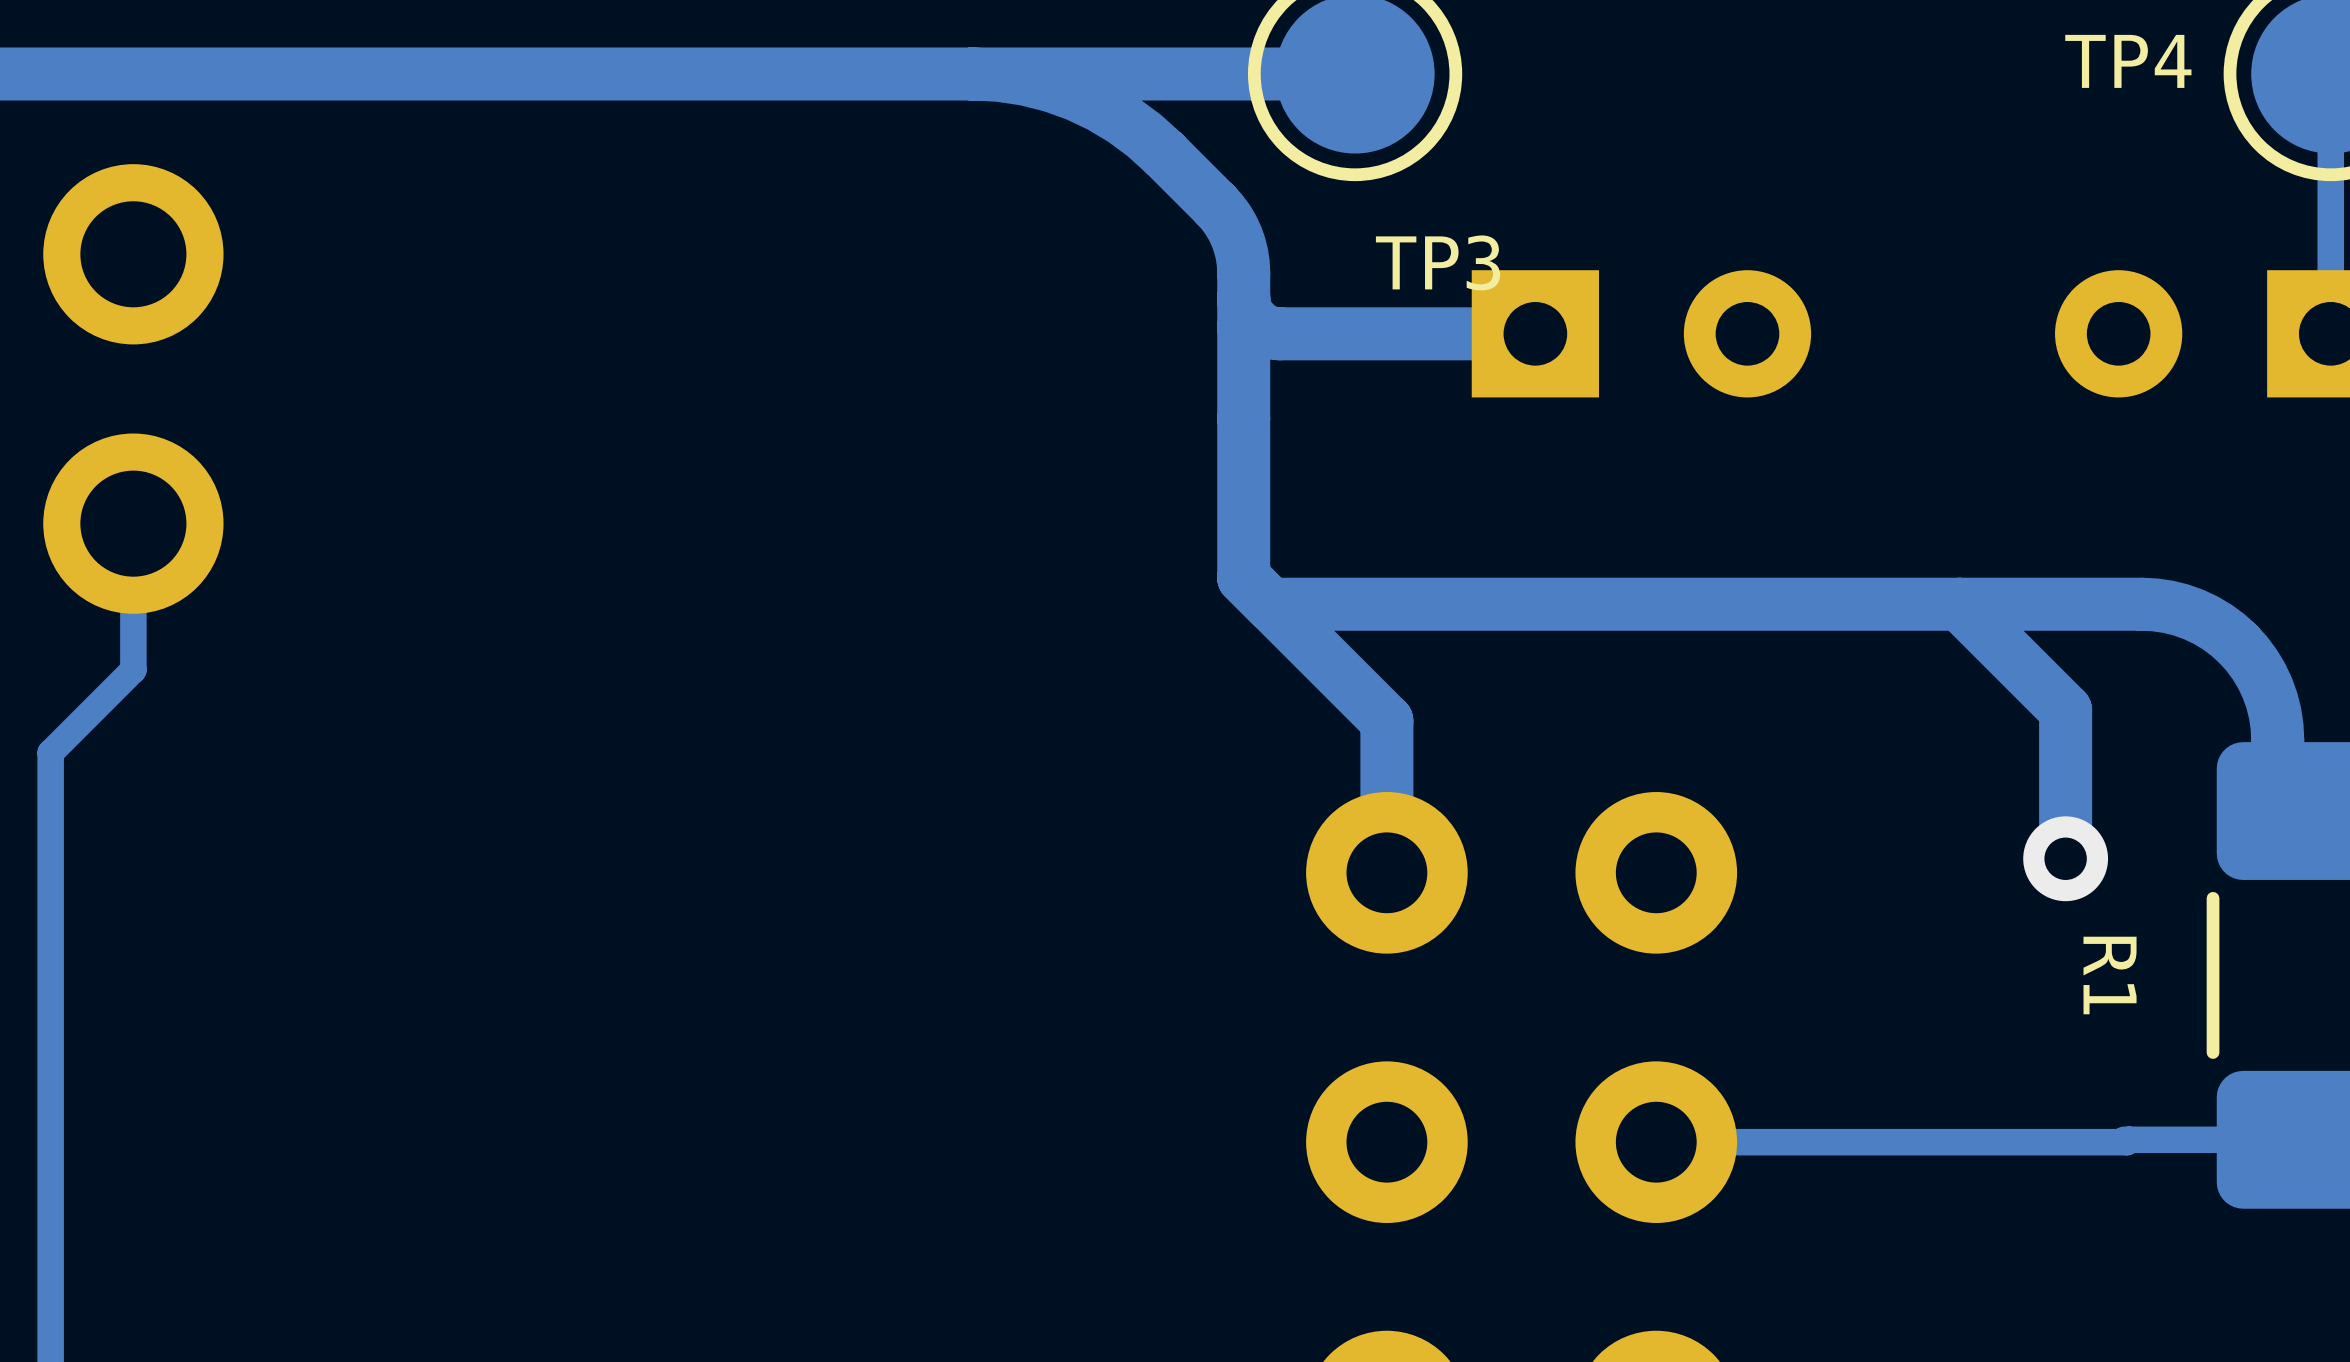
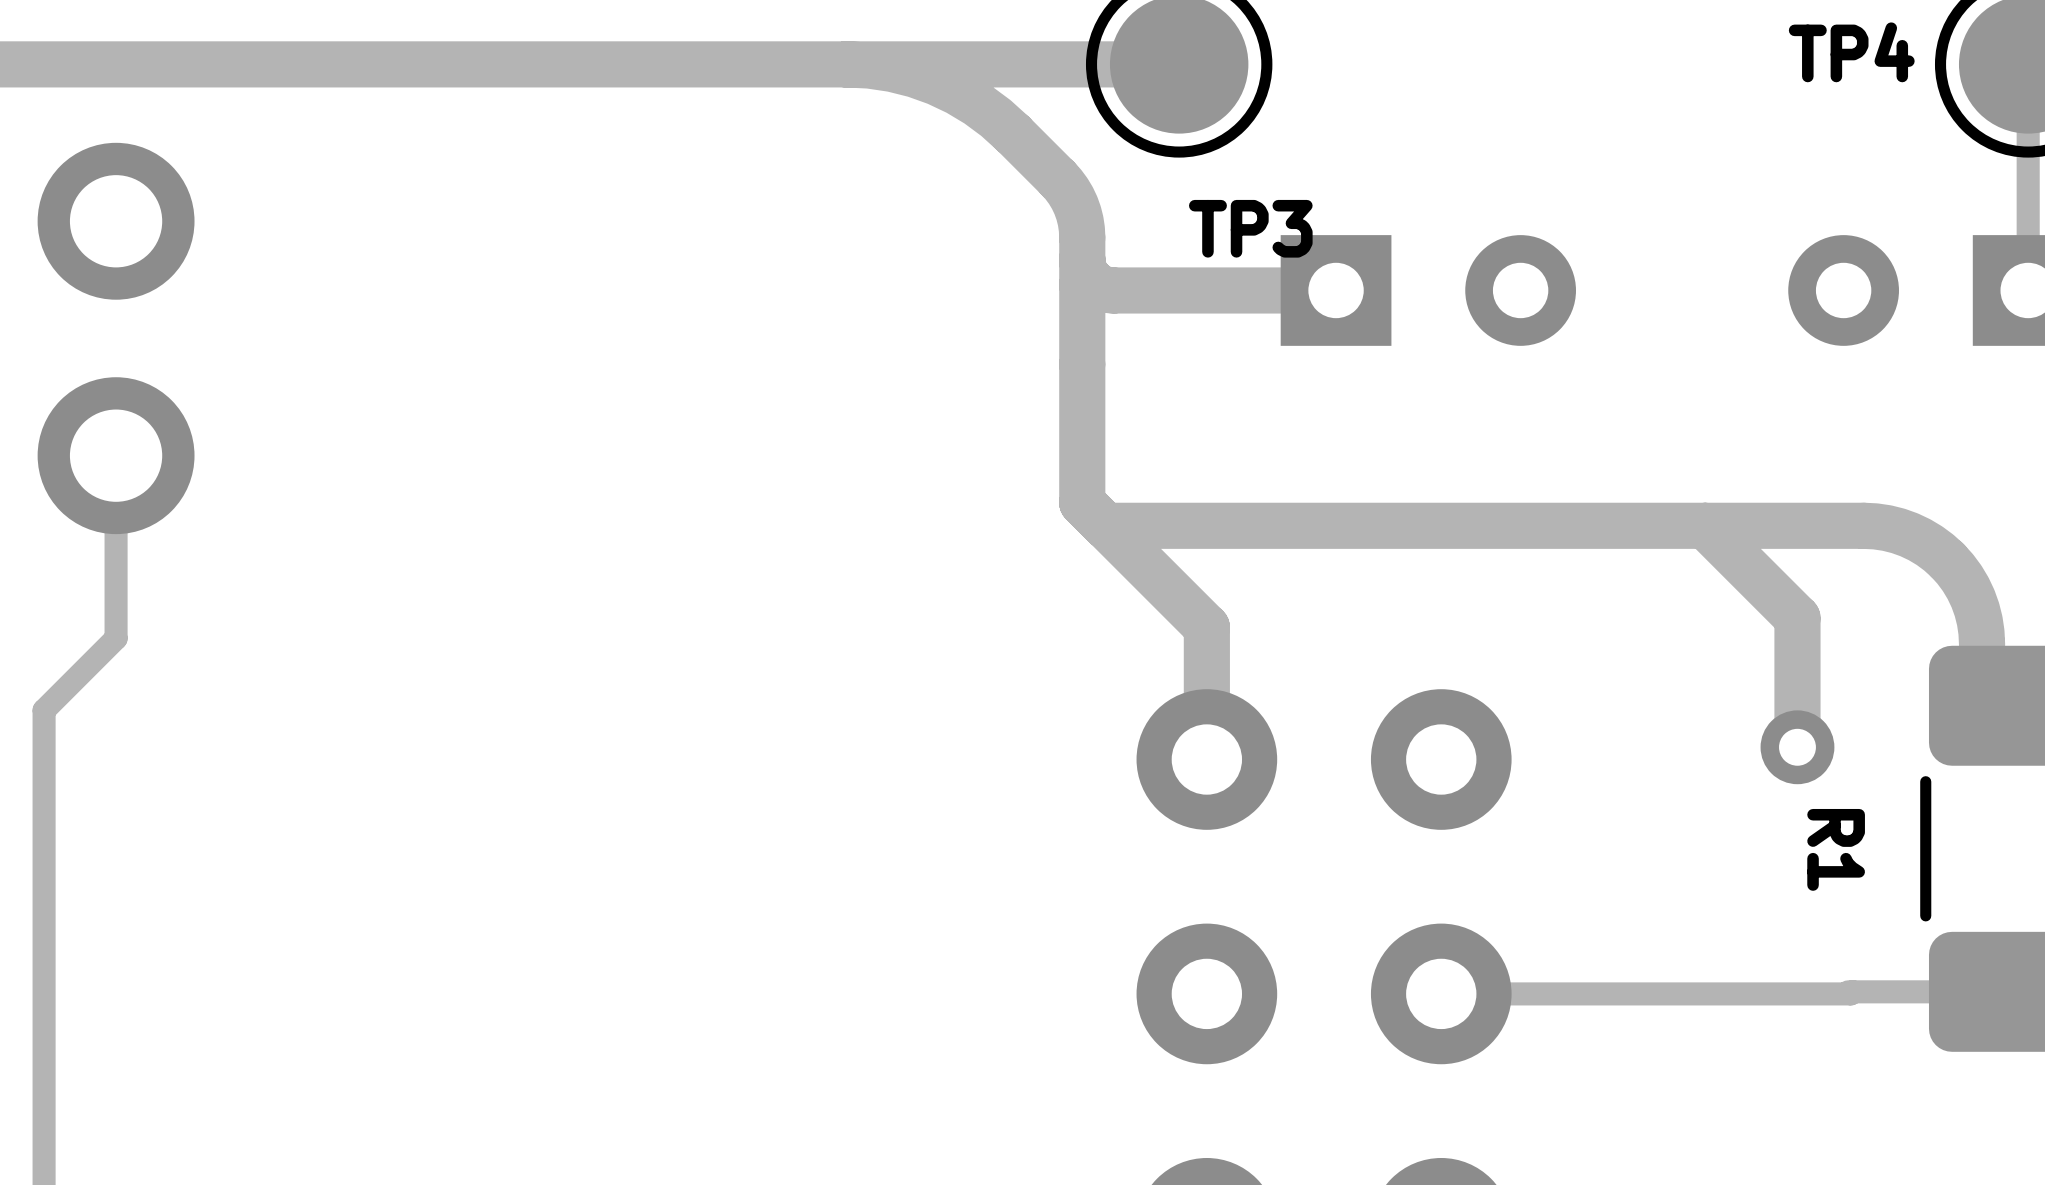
track: (133, 670) (50, 752) (50, 816) -> (116, 583) (116, 638) (44, 710)

